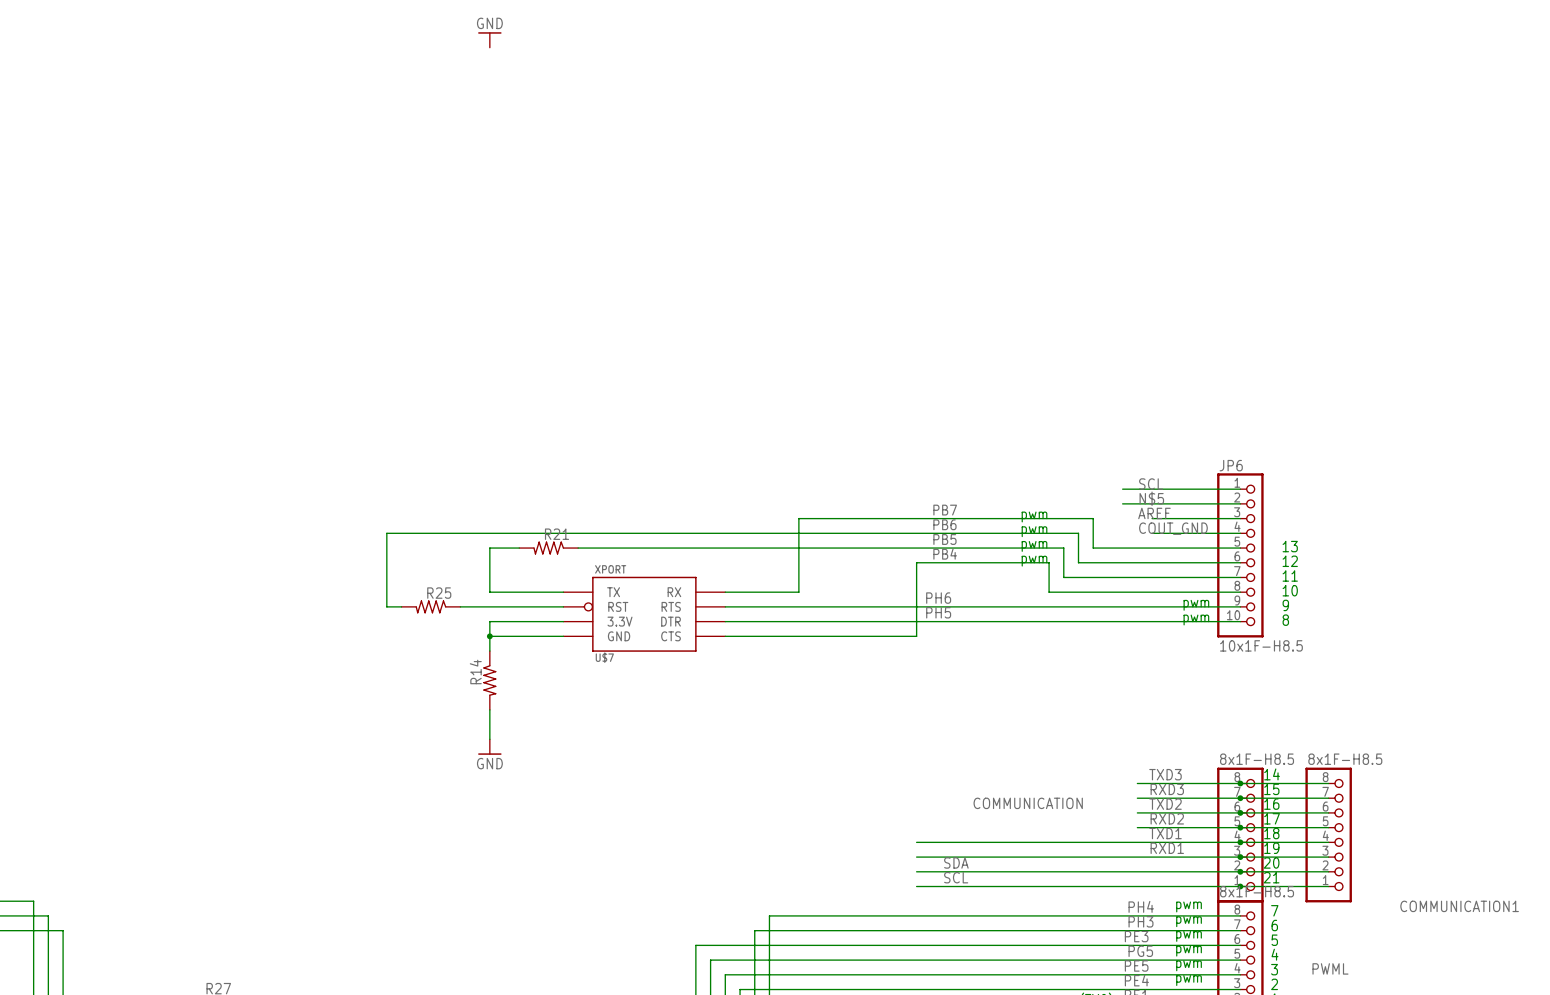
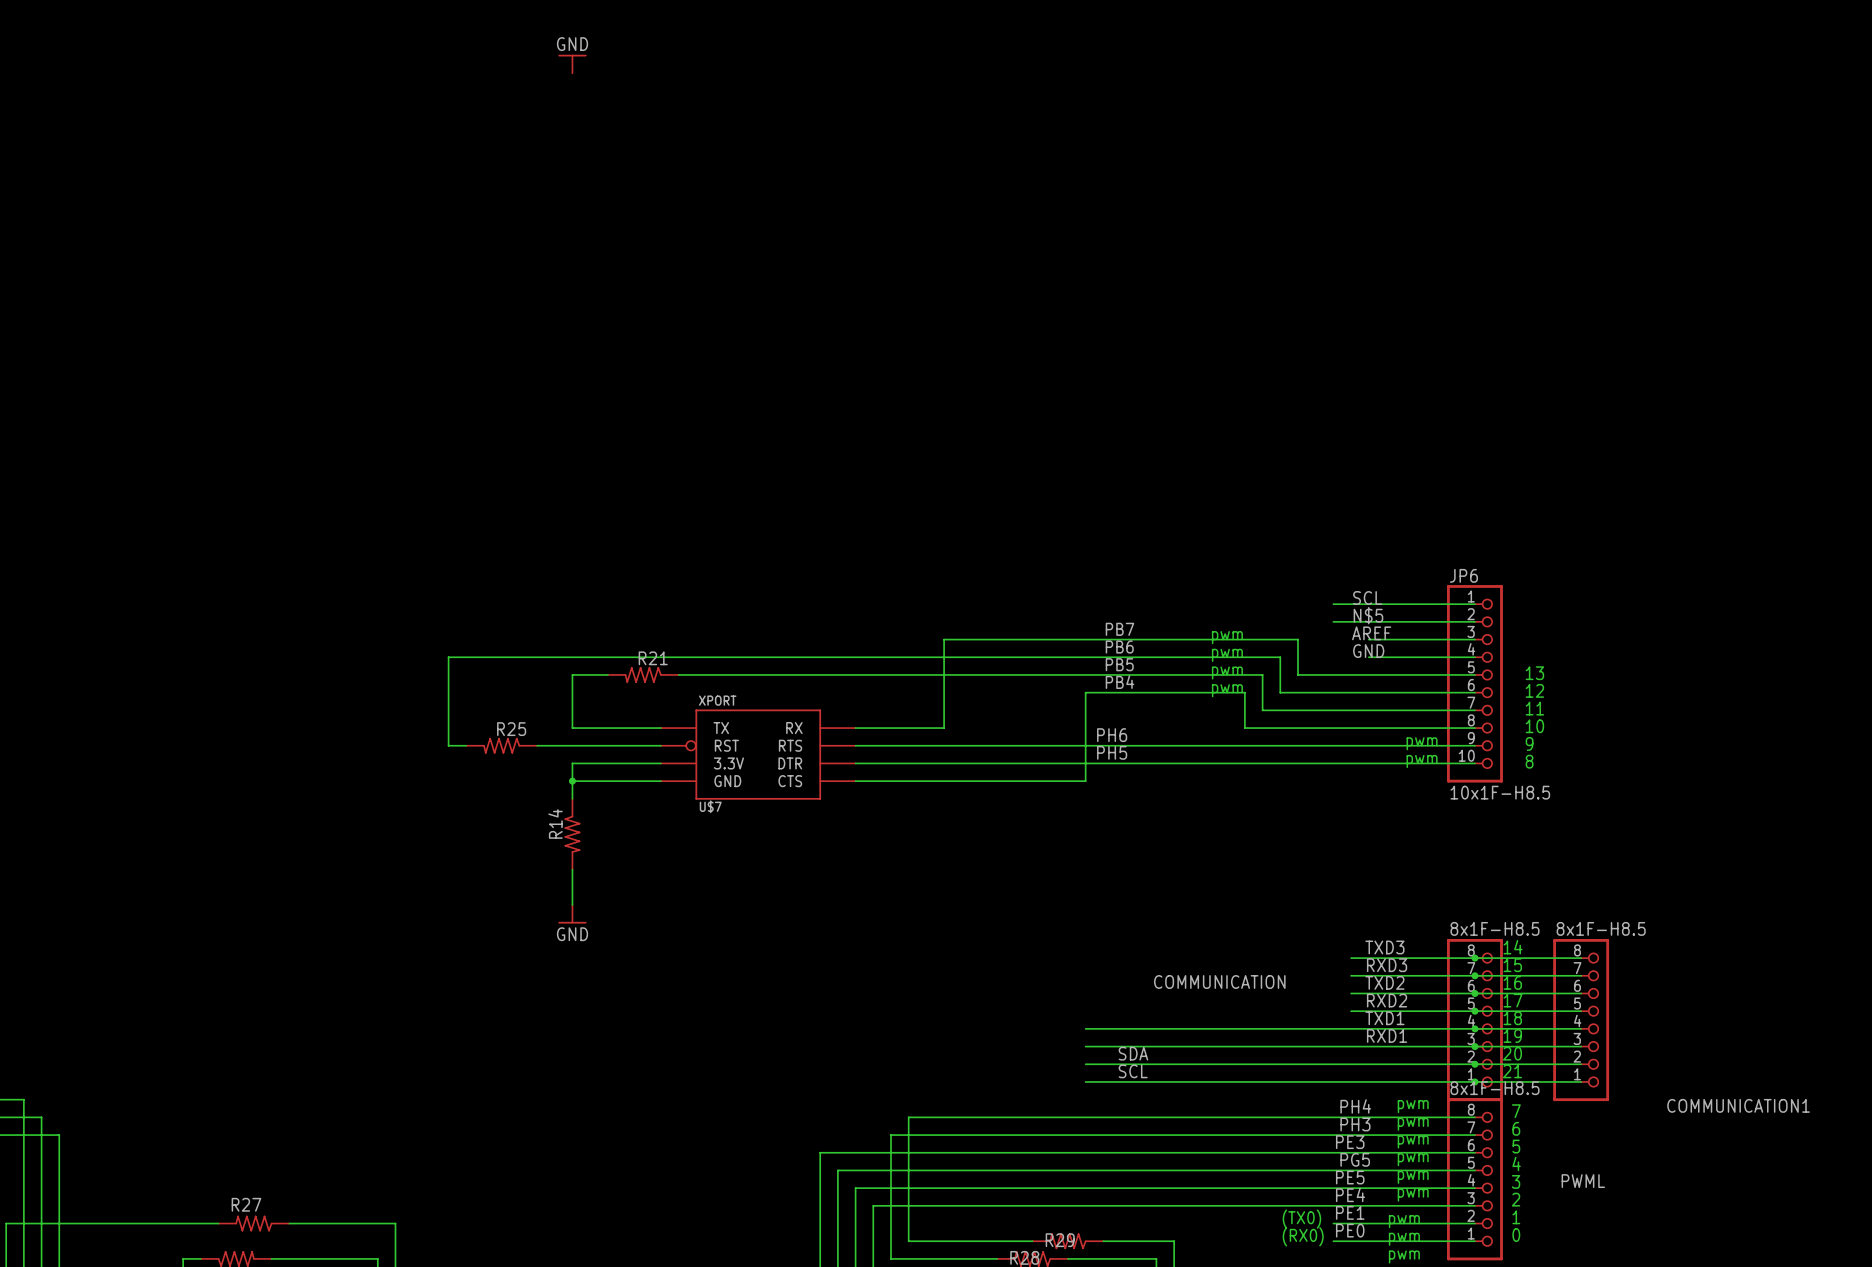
label: COUT_GND (1173, 528) -> GND (1368, 651)

